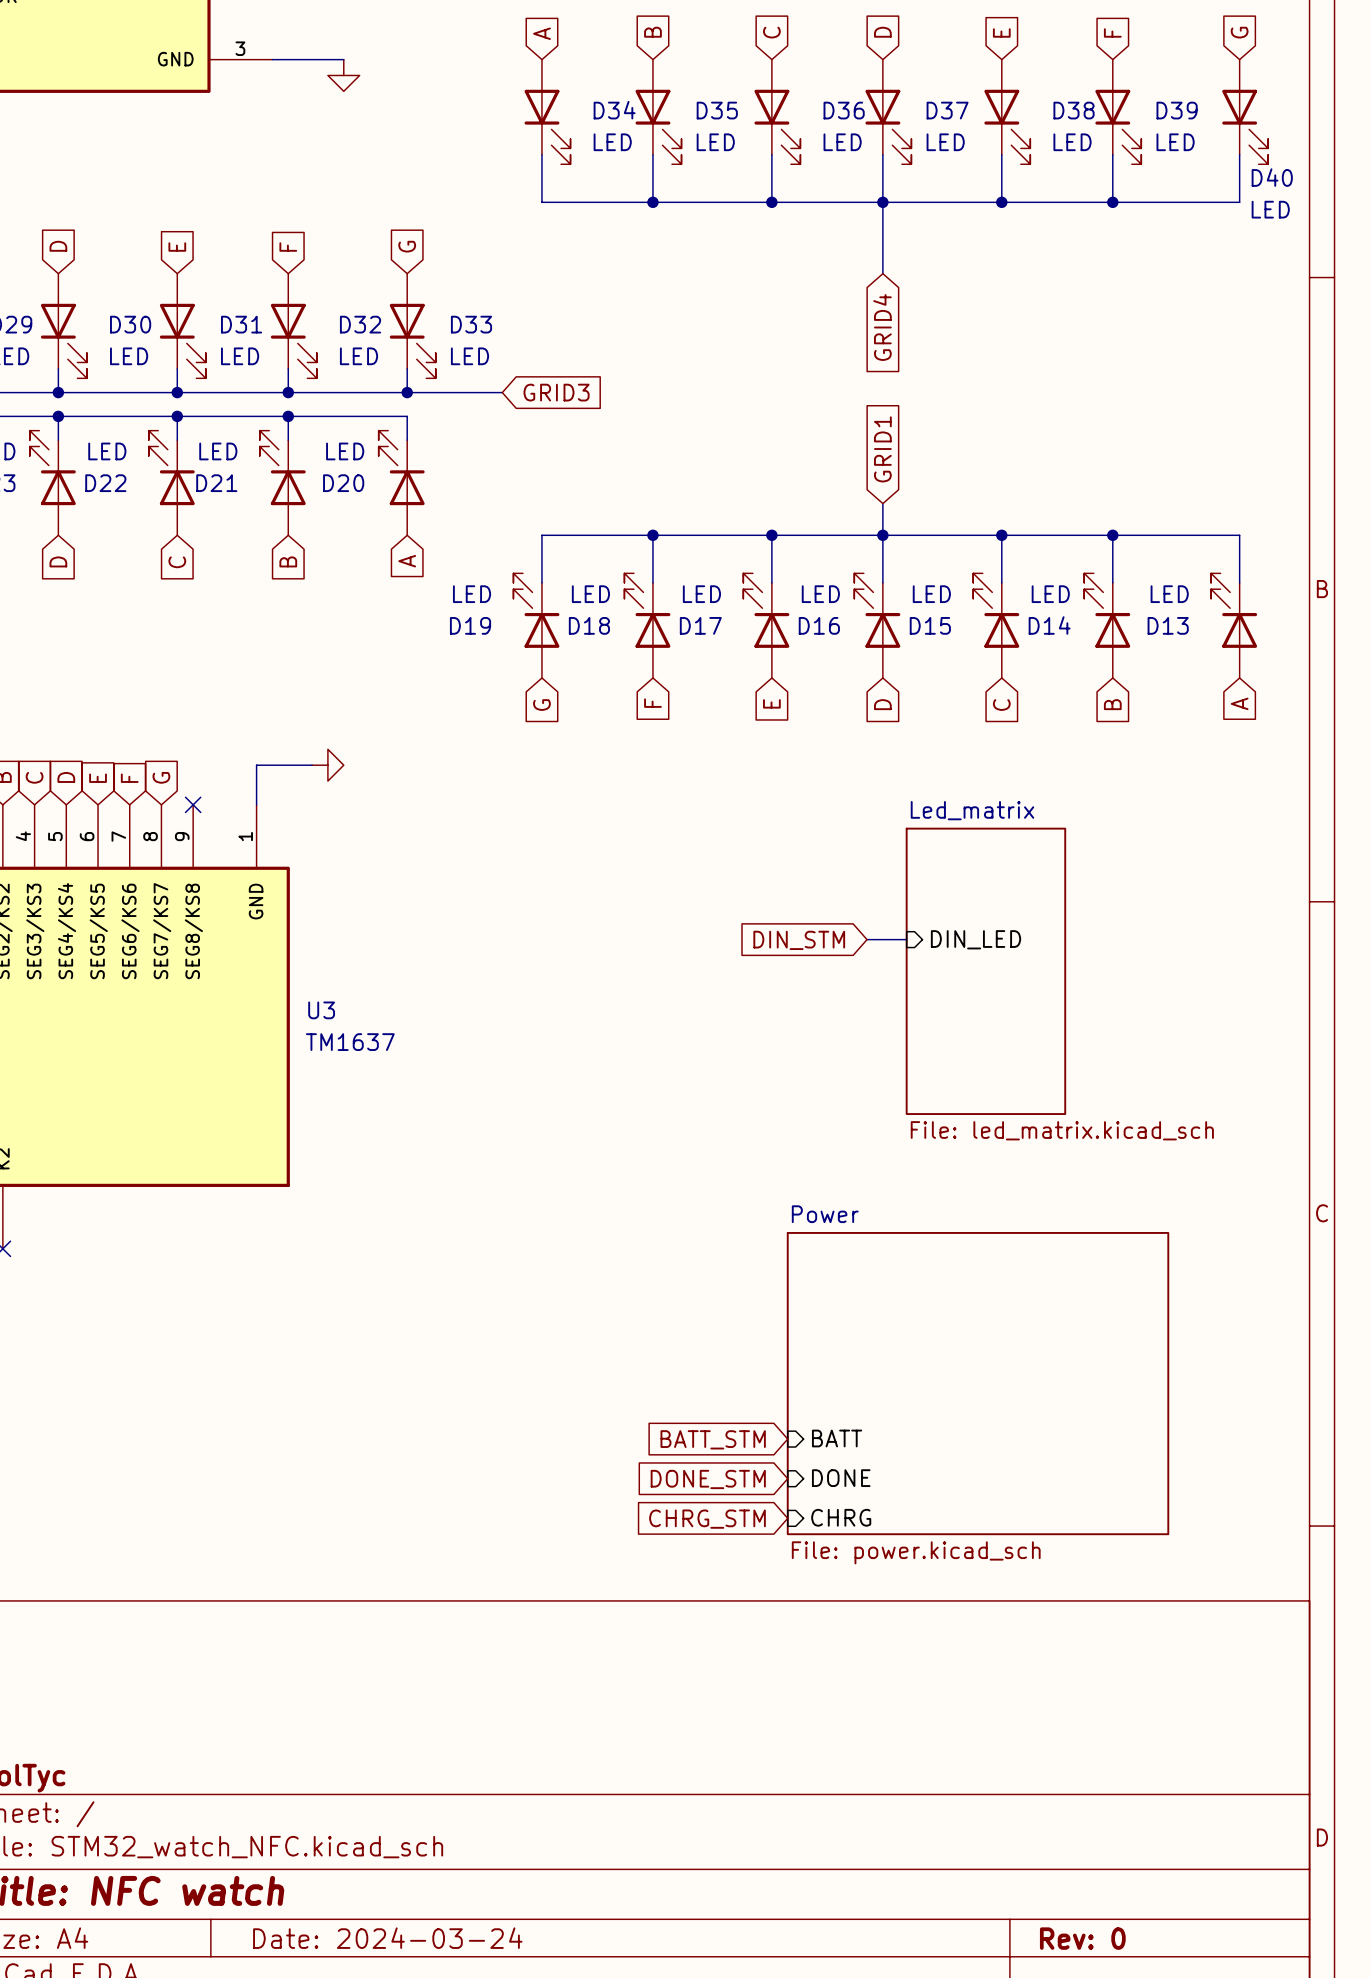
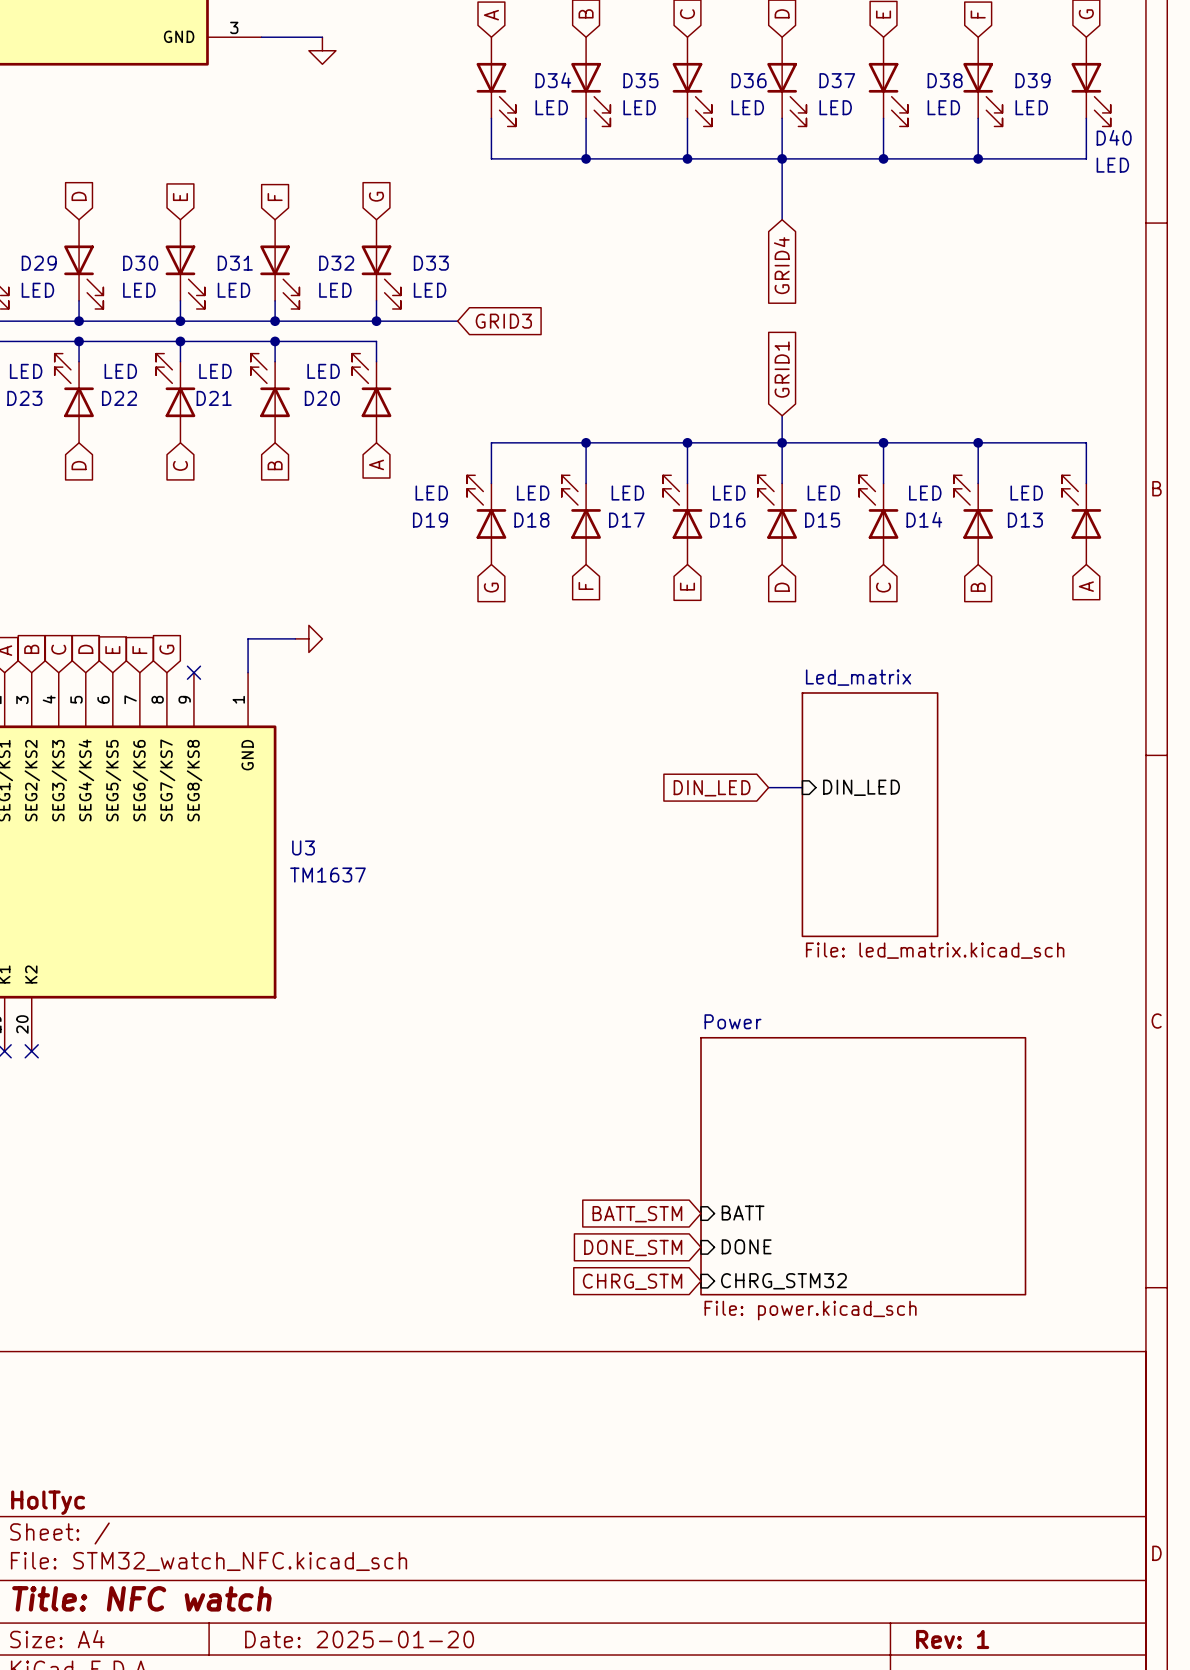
global label: DIN_STM (799, 940) -> DIN_LED (712, 788)
sheet pin: CHRG (841, 1517) -> CHRG_STM32 (783, 1281)
title block: Date: 2024-03-24 (387, 1938) -> Date: 2025-01-20 (359, 1639)
title block: Rev: 0 (1082, 1938) -> Rev: 1 (952, 1639)

